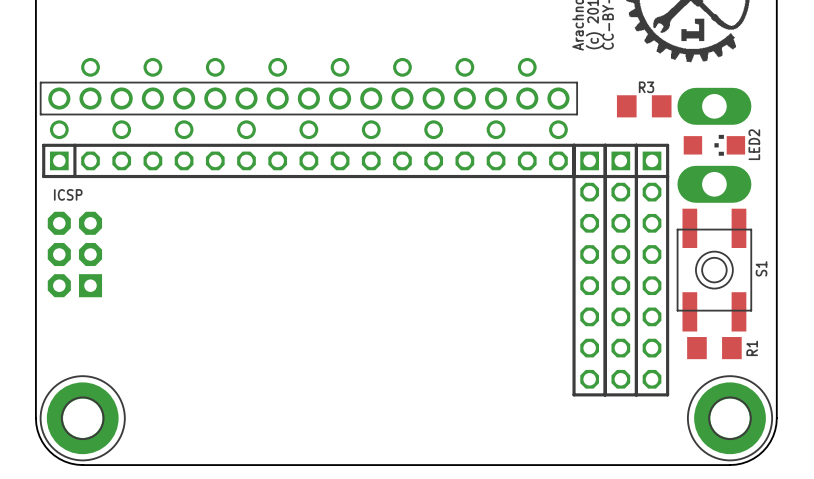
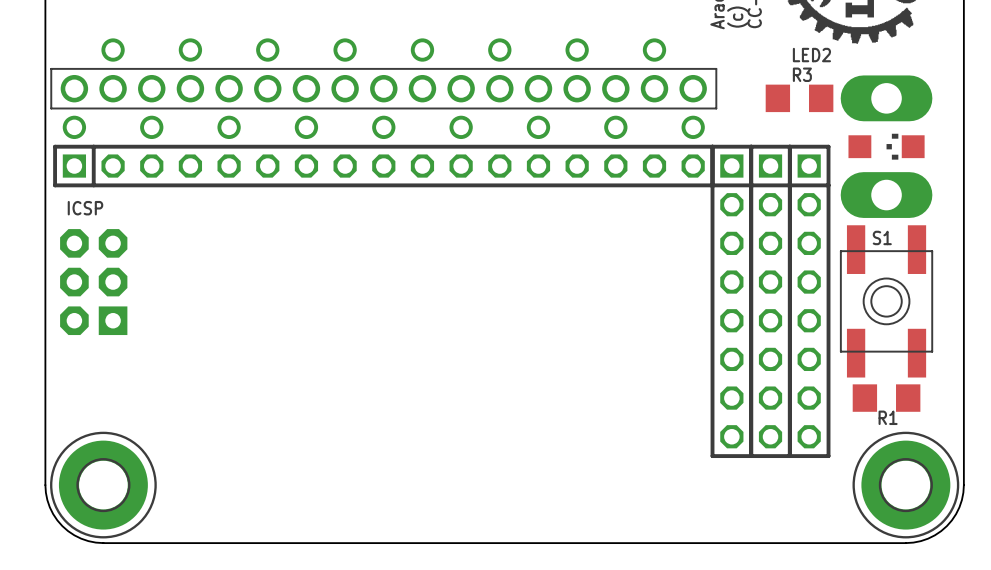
LED2 name rotation: 0° (754, 144) -> 90° clockwise (811, 55)
LED2 name position: LED2 (754, 144) -> LED2 (811, 55)
S1 name rotation: 0° (761, 268) -> 90° clockwise (882, 237)
S1 name position: S1 (761, 268) -> S1 (882, 237)
R1 name rotation: 0° (752, 348) -> 90° clockwise (888, 417)
R1 name position: R1 (752, 348) -> R1 (888, 417)

